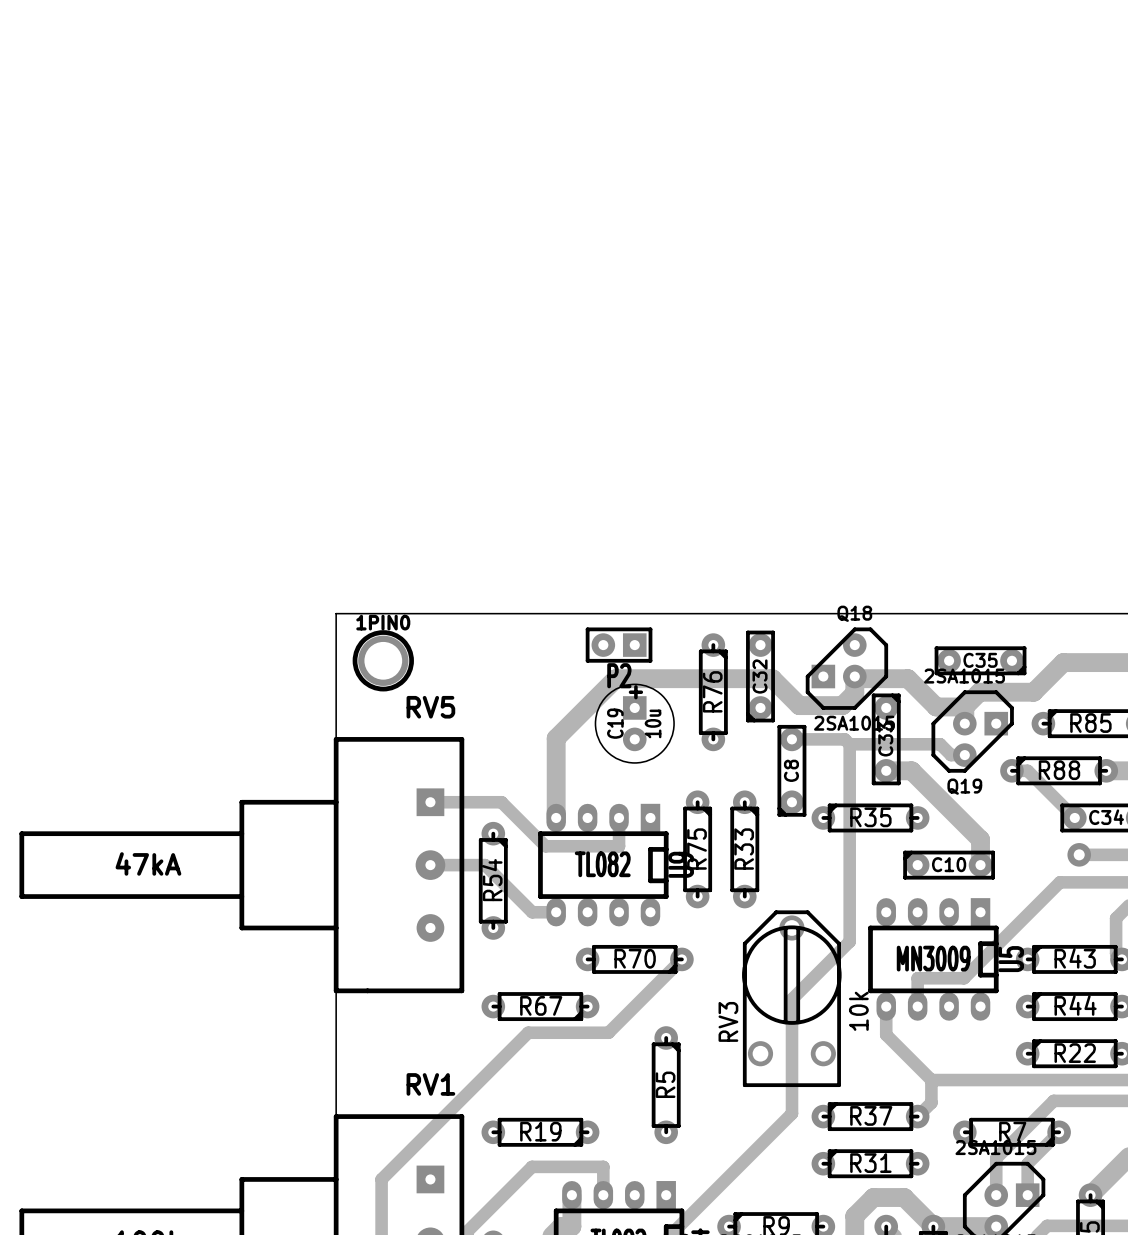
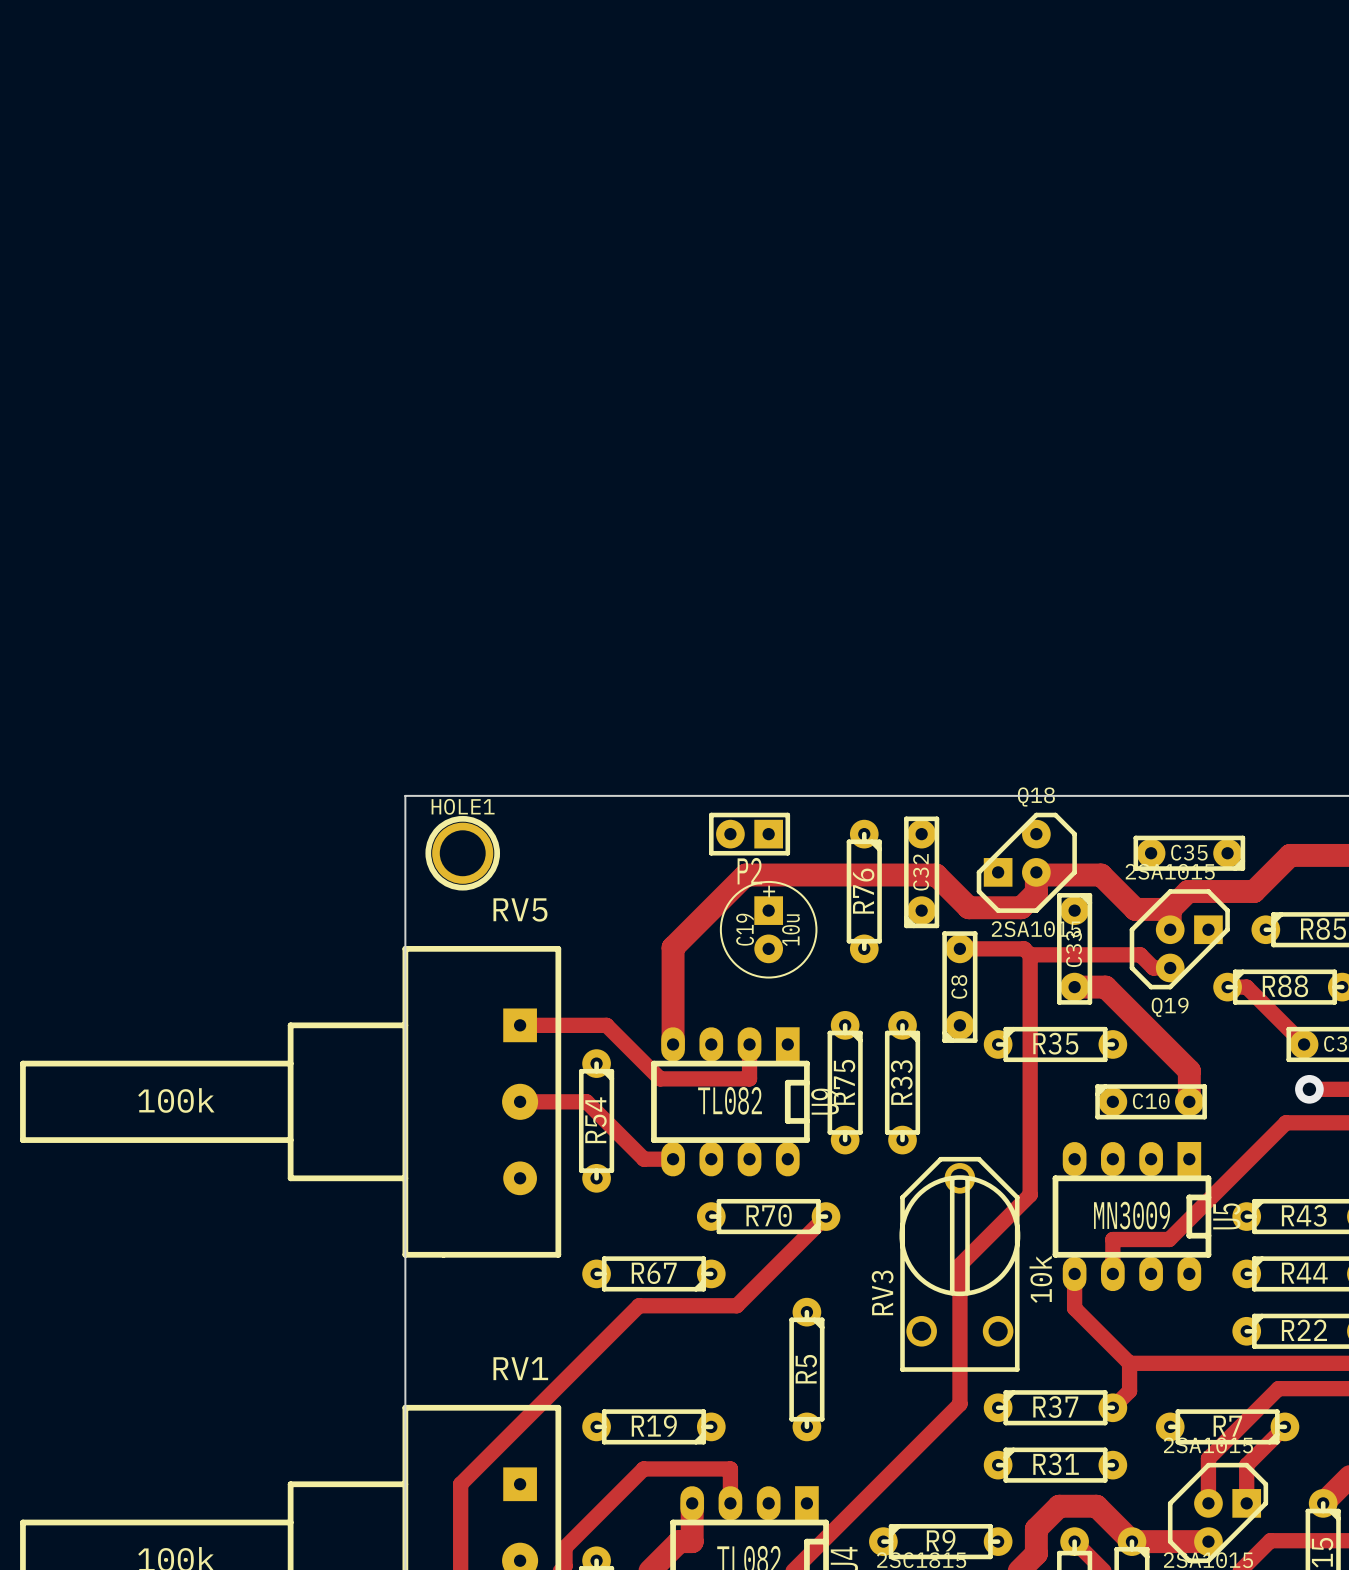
1PIN0 name: 1PIN0 (383, 622) -> HOLE1 (463, 806)
RV5 value: 47kA (148, 863) -> 100k (176, 1100)

